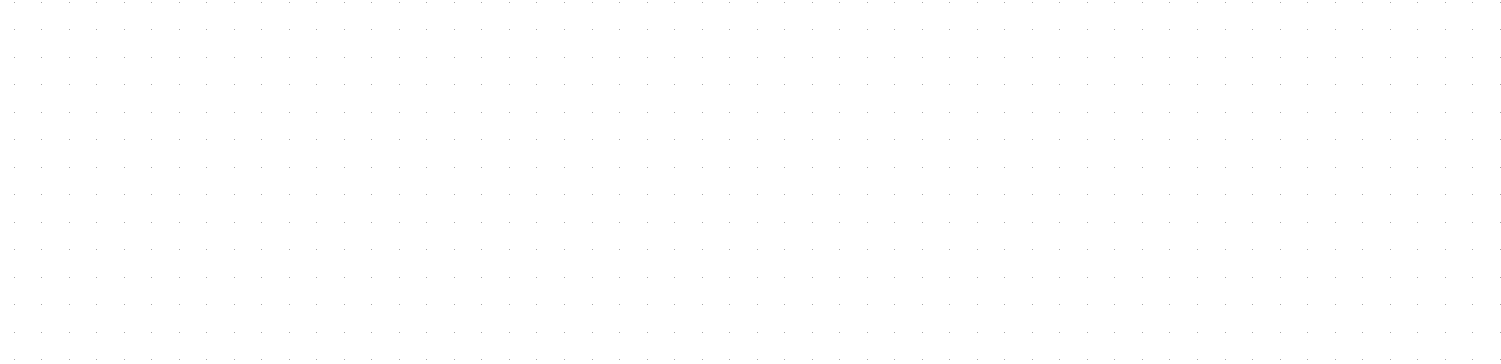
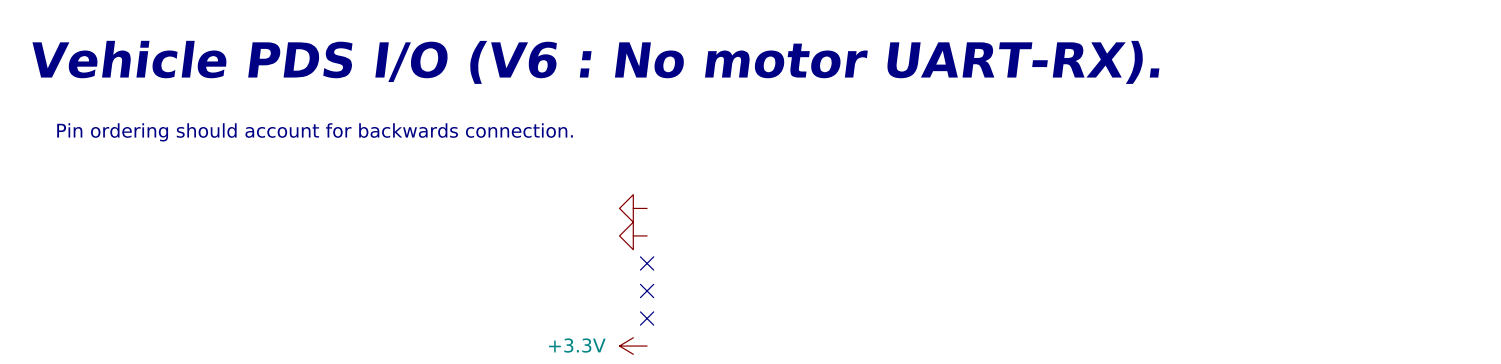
text: none -> Vehicle PDS I/O (V6 : No motor UART-RX). (595, 62)
text: none -> Pin ordering should account for backwards connection. (315, 132)
power symbol: none -> (633, 208)
power symbol: none -> (633, 235)
no-connect mark: none -> (647, 263)
no-connect mark: none -> (647, 290)
no-connect mark: none -> (647, 318)
power symbol: none -> +3.3V (633, 346)

